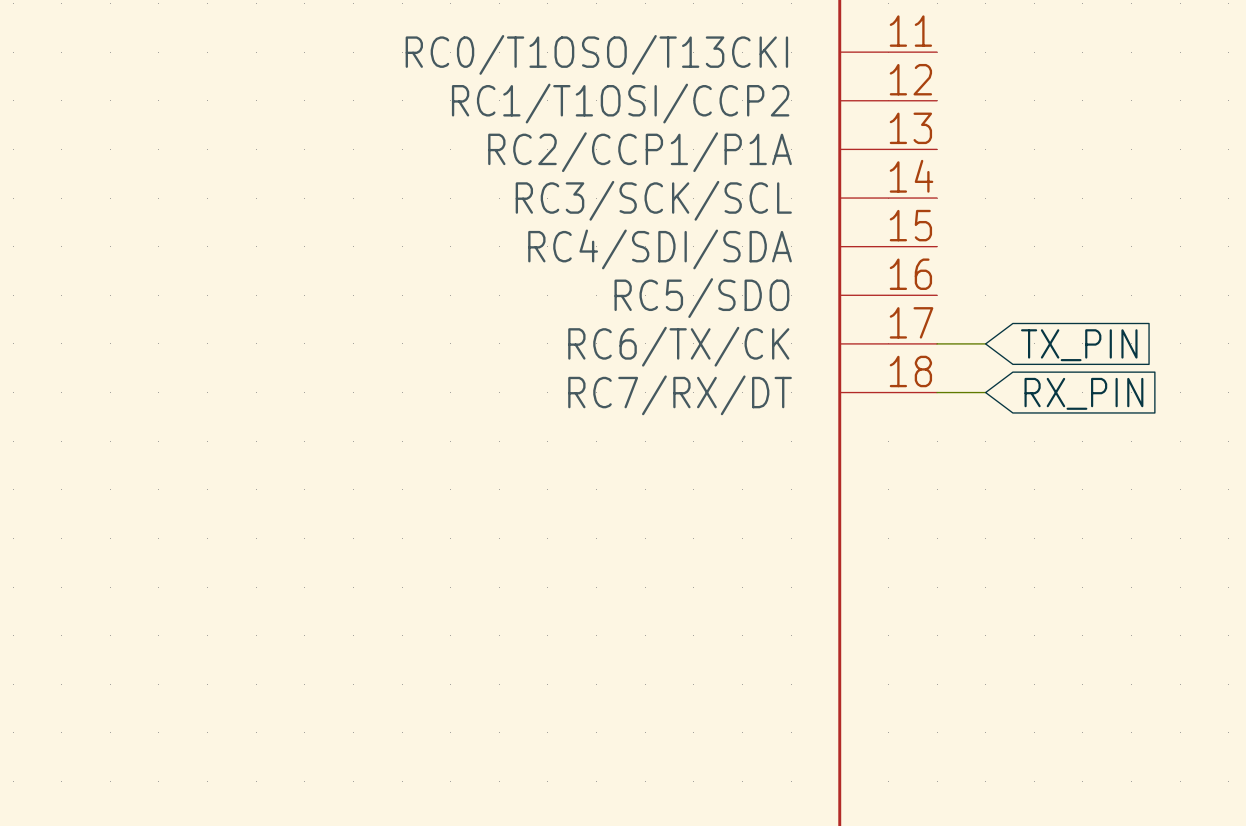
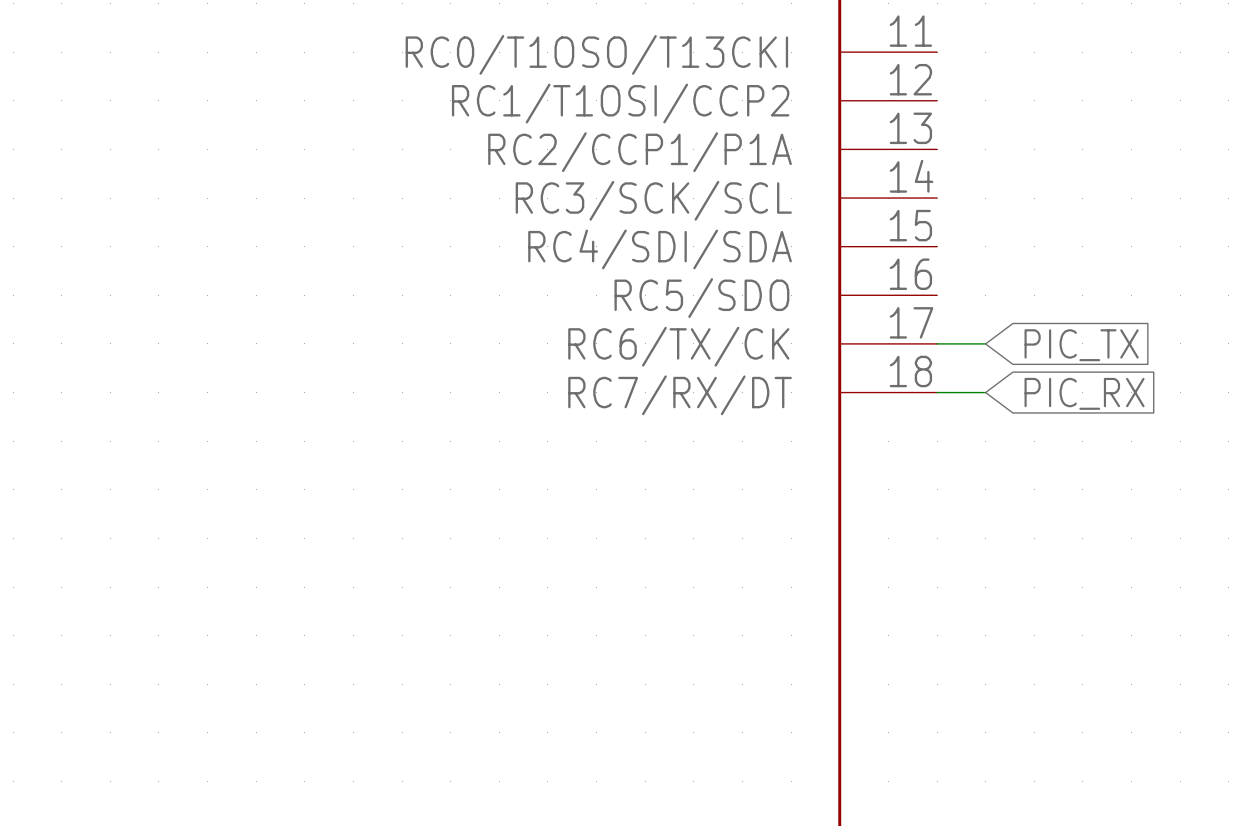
global label: TX_PIN (1079, 345) -> PIC_TX (1081, 345)
global label: RX_PIN (1083, 393) -> PIC_RX (1084, 393)

